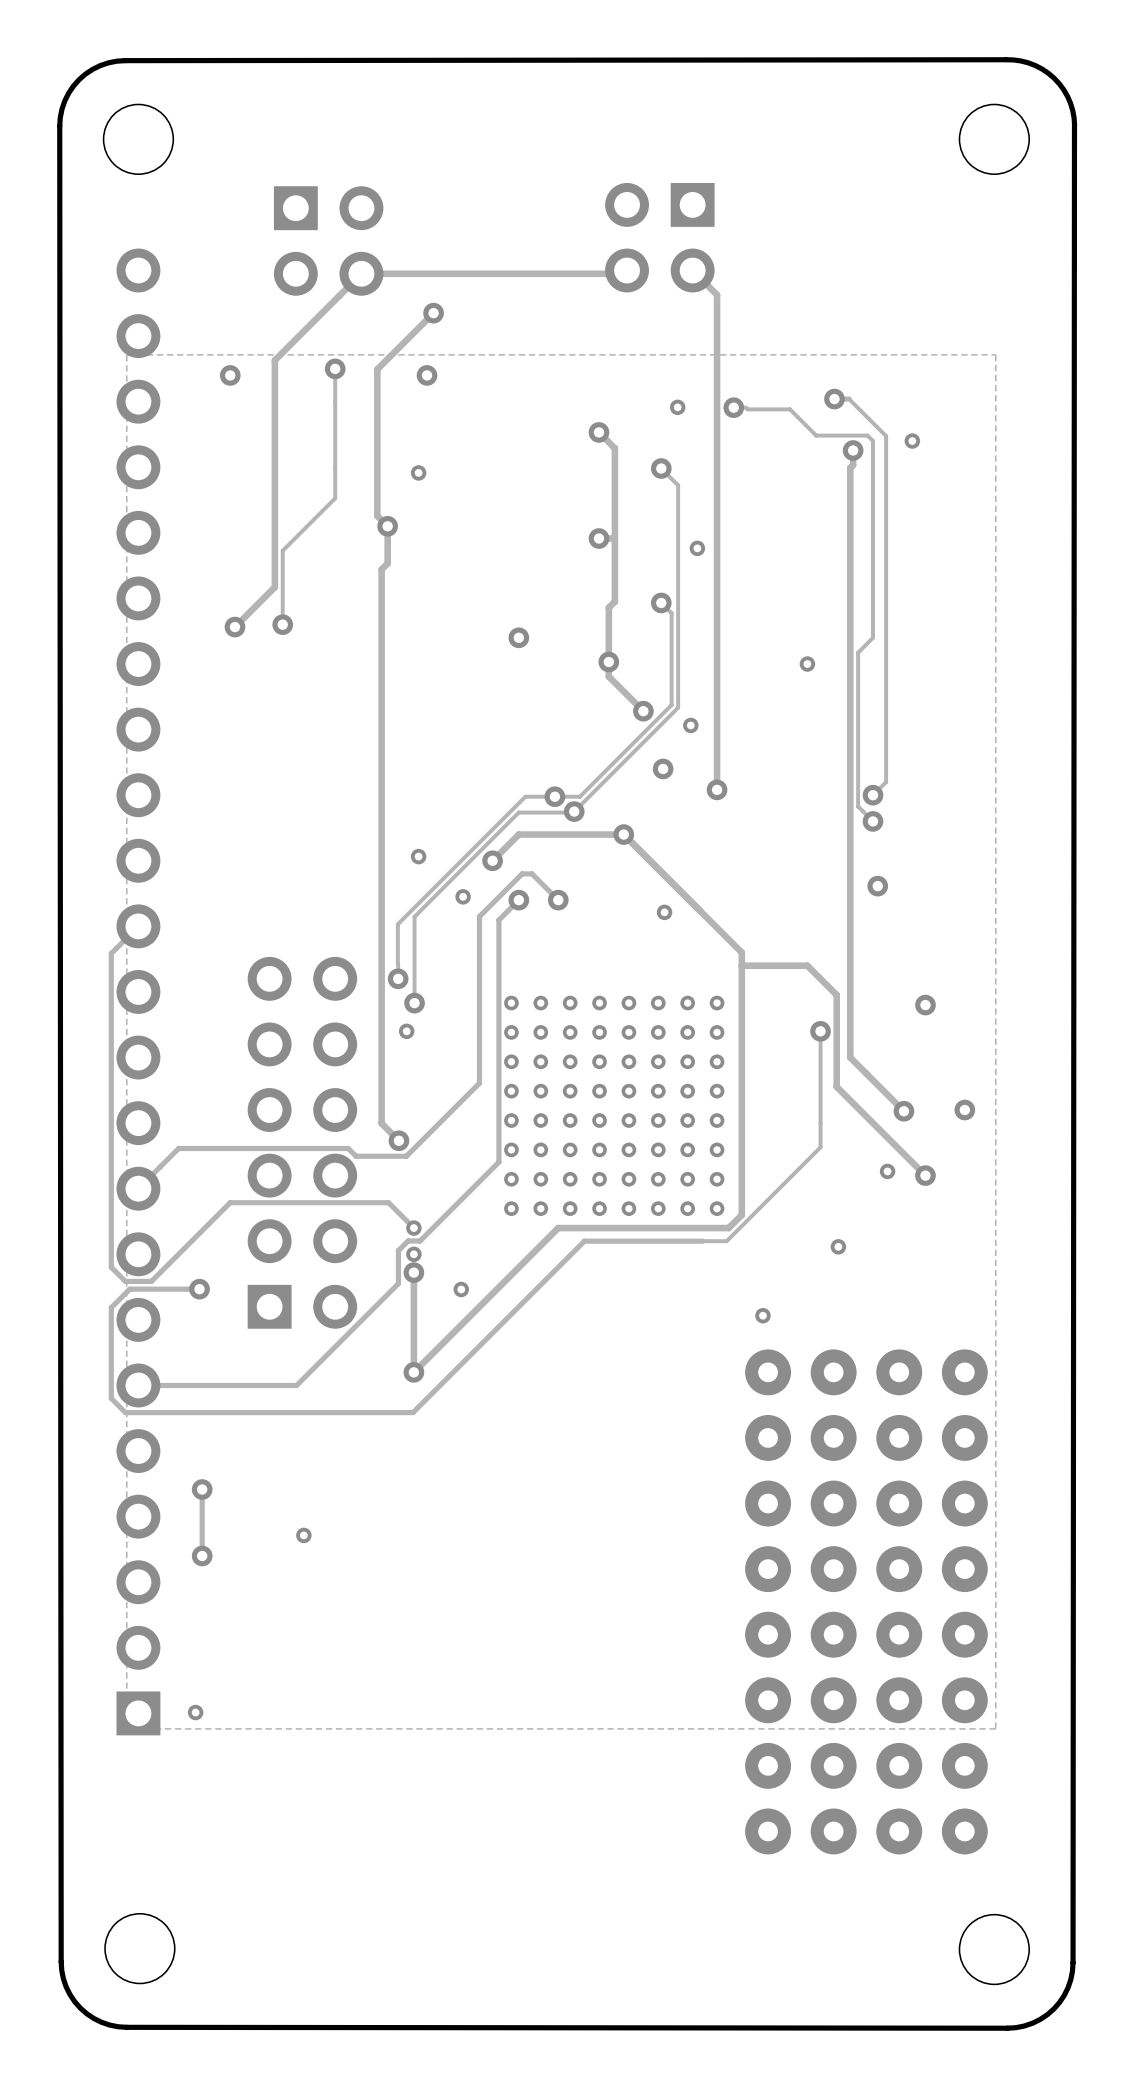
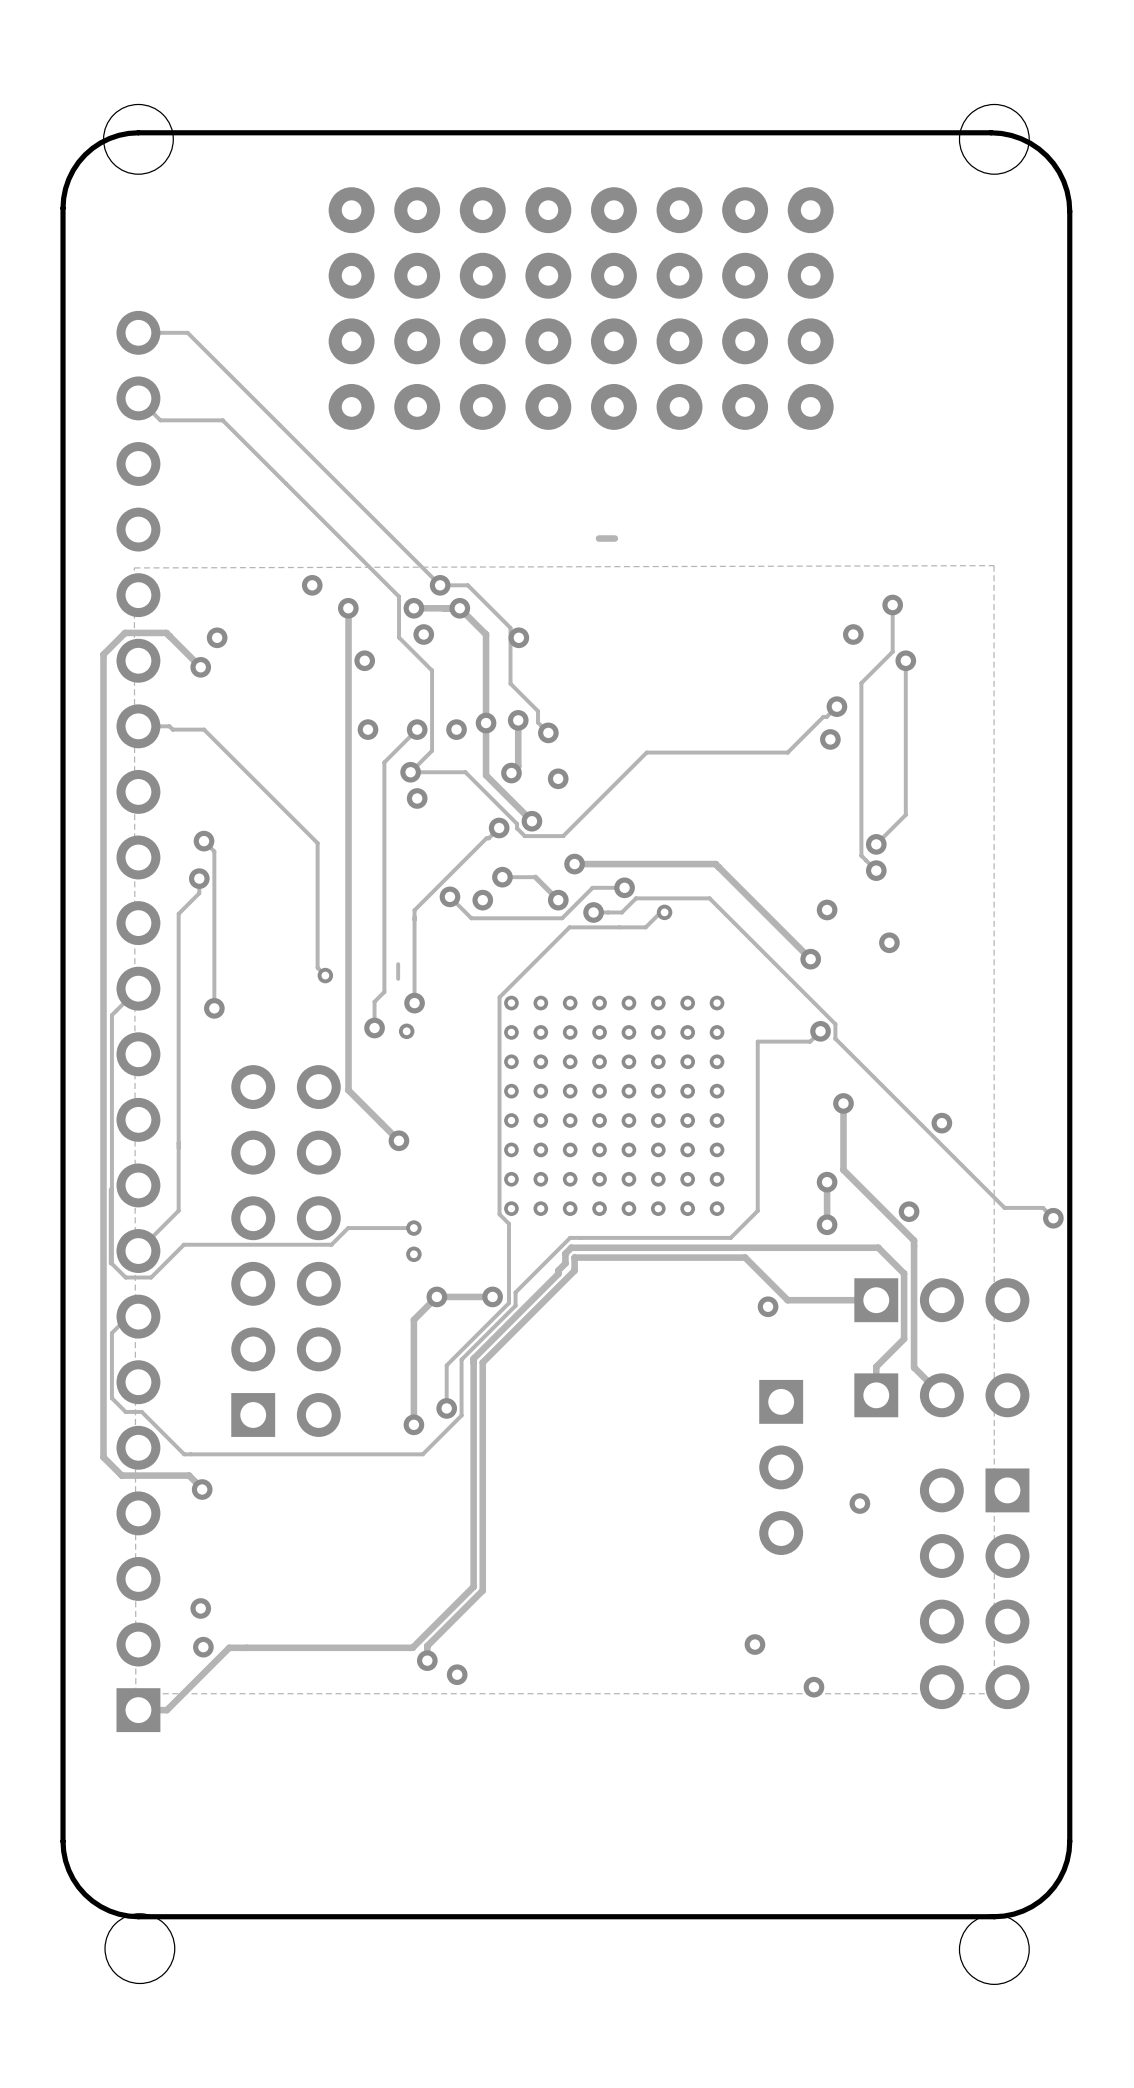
board edge: (1006, 59) (1028, 62) (1042, 69) (1054, 78) (1063, 89) (1070, 103) (1074, 125) (1073, 1962) (1068, 1987) (1059, 2002) (1040, 2019) (1024, 2025) (1007, 2028) (126, 2027) (101, 2022) (86, 2013) (69, 1994) (63, 1978) (61, 1961) (59, 126) (64, 101) (73, 86) (92, 69) (108, 62) (125, 60) (1005, 59) -> none
board edge: none -> (991, 132) (138, 132) (118, 135) (100, 142) (85, 154) (73, 170) (65, 188) (63, 208) (63, 1841) (65, 1860) (73, 1879) (85, 1894) (100, 1906) (118, 1914) (138, 1916) (994, 1916) (1013, 1914) (1032, 1906) (1047, 1894) (1059, 1879) (1067, 1860) (1069, 1841) (1069, 211) (1063, 181) (1046, 155) (1021, 138) (991, 132)
part: (659, 237) -> none
part: (328, 240) -> none
track: (627, 270) (623, 273) (361, 273) (274, 360) (274, 587) (234, 627) -> none
track: (692, 270) (717, 294) (717, 789) -> none
part: none -> (581, 308)
track: (433, 313) (377, 369) (377, 515) (387, 526) (387, 563) (381, 569) (381, 1123) -> (348, 608) (348, 1090) (381, 1123)
via: (433, 313) -> none
track: none -> (138, 332) (187, 332) (440, 585) (467, 585) (510, 627) (510, 683) (538, 711) (538, 722) (548, 732)
zone outline: (995, 354) (126, 354) (126, 1728) (995, 1728) (995, 354) -> (994, 565) (994, 1693) (135, 1693) (134, 567) (994, 565)
track: (335, 368) (335, 498) (282, 550) (282, 624) -> none
via: (335, 368) -> none
via: (230, 375) -> none
via: (427, 375) -> none
track: none -> (138, 398) (160, 420) (222, 420) (399, 596) (399, 637) (432, 670) (432, 750) (410, 772) (465, 772) (517, 823) (517, 828) (524, 836) (563, 836) (646, 752) (787, 752) (823, 716) (826, 716) (836, 706)
track: (834, 399) (849, 399) (886, 436) (886, 782) (873, 795) -> none
via: (834, 399) -> none
via: (677, 407) -> none
track: (733, 407) (790, 409) (816, 435) (867, 435) (873, 441) (873, 637) (858, 652) (858, 806) (873, 821) -> none
via: (733, 407) -> none
track: (598, 432) (614, 448) (614, 601) (608, 607) (608, 676) (643, 711) -> none
via: (598, 432) -> none
via: (912, 441) -> none
track: (853, 450) (853, 465) (850, 467) (850, 1057) (903, 1111) -> none
via: (853, 450) -> none
track: (661, 468) (678, 485) (678, 707) (573, 812) (518, 812) (414, 916) -> (499, 827) (414, 910) (414, 916)
via: (661, 468) -> none
via: (418, 472) -> none
via: (387, 526) -> none
via: (598, 538) -> none
via: (697, 548) -> none
via: none -> (312, 585)
via: none -> (440, 585)
track: (661, 602) (671, 613) (671, 704) (579, 796) (525, 796) (397, 924) (397, 963) -> none
via: (661, 602) -> none
track: none -> (892, 605) (892, 651) (861, 683) (861, 855) (876, 870)
via: none -> (892, 605)
via: none -> (348, 608)
track: none -> (413, 608) (459, 608) (486, 634) (486, 775) (531, 821)
via: none -> (413, 608)
via: none -> (459, 608)
via: (282, 624) -> none
via position: (234, 627) -> (217, 637)
via: none -> (423, 634)
via: none -> (853, 634)
via: none -> (364, 660)
track: none -> (905, 660) (905, 814) (876, 844)
via: none -> (905, 660)
via: (608, 661) -> none
via: (807, 664) -> none
track: none -> (200, 667) (166, 632) (125, 632) (103, 654) (103, 1457) (121, 1475) (189, 1475) (200, 1487)
via: none -> (200, 667)
via: none -> (836, 706)
via: (643, 711) -> none
track: none -> (518, 720) (518, 766) (511, 773)
via: none -> (518, 720)
via: none -> (486, 723)
via: (690, 725) -> none
track: none -> (138, 726) (169, 726) (172, 729) (204, 729) (317, 843) (317, 967) (325, 975)
via: none -> (367, 729)
track: none -> (417, 729) (384, 762) (384, 991) (374, 1001) (374, 1028)
via: none -> (417, 729)
via: none -> (456, 729)
via: none -> (548, 732)
via: none -> (830, 739)
via: (663, 768) -> none
via: none -> (410, 772)
via: none -> (511, 773)
via: (717, 789) -> none
via: (873, 795) -> none
via position: (554, 796) -> (558, 778)
via: none -> (417, 798)
via: (574, 811) -> none
via: none -> (531, 821)
via: (873, 821) -> none
via: none -> (499, 827)
via: (623, 834) -> none
track: none -> (204, 841) (214, 851) (214, 1011)
via: none -> (204, 841)
via: none -> (876, 844)
via: (418, 856) -> none
track: (492, 860) (518, 834) (623, 834) (741, 952) (741, 1214) (728, 1228) (558, 1228) (413, 1372) -> (413, 1424) (413, 1372)
via position: (492, 860) -> (502, 877)
track: none -> (574, 864) (715, 864) (810, 959)
via: none -> (574, 864)
track: (535, 877) (532, 873) (522, 873) (479, 916) (479, 1083) (406, 1156) (355, 1156) (348, 1148) (178, 1148) (138, 1188) -> (535, 877) (502, 877)
track: none -> (199, 878) (199, 893) (178, 913) (178, 1210) (138, 1251)
via: none -> (199, 878)
via position: (877, 886) -> (876, 870)
track: none -> (624, 887) (592, 887) (562, 918) (471, 918) (449, 896)
via: none -> (624, 887)
via position: (463, 896) -> (449, 896)
via: none -> (482, 900)
track: (518, 900) (498, 920) (498, 1162) (420, 1240) (408, 1240) (398, 1250) (398, 1283) (296, 1385) (138, 1385) -> none
via: (518, 900) -> none
via: none -> (827, 909)
track: none -> (593, 912) (621, 912) (636, 898) (709, 898) (835, 1024) (835, 1038) (1004, 1207) (1043, 1207) (1053, 1218)
via: none -> (593, 912)
track: none -> (659, 913) (645, 927) (569, 927) (499, 997) (499, 1214) (509, 1223) (509, 1303) (446, 1365) (446, 1408)
track: (138, 926) (111, 953) (111, 1189) -> (138, 988) (111, 1015) (111, 1189)
via: none -> (889, 942)
via: none -> (810, 959)
track: (741, 965) (807, 965) (836, 995) (836, 1086) (925, 1175) -> none
via: none -> (325, 975)
via: (398, 978) -> none
part: (138, 991) -> none
via: (925, 1005) -> none
via: none -> (214, 1008)
part: none -> (138, 1021)
via: none -> (374, 1028)
track: (820, 1031) (820, 1147) (726, 1241) (584, 1241) (413, 1412) (125, 1412) (111, 1398) (111, 1307) (129, 1289) (199, 1289) -> (820, 1031) (810, 1041) (757, 1041) (757, 1210) (730, 1237) (570, 1237) (515, 1292) (515, 1305) (461, 1359) (461, 1415) (422, 1454) (184, 1454) (141, 1411) (125, 1411) (111, 1398) (111, 1333) (128, 1316) (138, 1316)
track: none -> (843, 1103) (843, 1170) (914, 1240) (914, 1367) (941, 1395)
via: none -> (843, 1103)
via: (964, 1110) -> none
via: (903, 1111) -> none
via: none -> (941, 1123)
part position: (302, 1142) -> (286, 1251)
via: (887, 1171) -> none
via: (925, 1175) -> none
track: none -> (827, 1182) (827, 1224)
via: none -> (827, 1182)
via: none -> (909, 1211)
via: none -> (1053, 1218)
via: none -> (827, 1224)
track: (413, 1228) (388, 1202) (230, 1202) (151, 1281) (125, 1281) (111, 1267) (111, 1263) -> (413, 1228) (348, 1228) (331, 1244) (183, 1244) (151, 1277) (125, 1277) (111, 1263)
via: (838, 1246) -> none
track: (413, 1272) (413, 1319) -> (492, 1296) (436, 1296) (413, 1319)
via position: (413, 1272) -> (436, 1296)
via: (199, 1289) -> none
via: (461, 1289) -> none
via: none -> (492, 1296)
track: none -> (876, 1300) (787, 1300) (745, 1257) (574, 1257) (574, 1270) (482, 1362) (482, 1590) (427, 1646) (427, 1660)
part: none -> (941, 1300)
via size: [755, 1307, 771, 1324] -> [757, 1296, 779, 1318]
via: (413, 1372) -> none
track: none -> (876, 1395) (876, 1366) (904, 1339) (904, 1273) (878, 1247) (571, 1247) (565, 1253) (565, 1263) (558, 1270) (558, 1273) (473, 1358) (473, 1586) (412, 1647) (229, 1647) (166, 1710) (138, 1710)
part: none -> (941, 1395)
via: none -> (446, 1408)
via: none -> (413, 1424)
part: none -> (781, 1467)
track: (202, 1489) (202, 1555) -> none
via: none -> (859, 1503)
via: (303, 1535) -> none
via: (202, 1556) -> none
part: none -> (974, 1588)
part: (866, 1601) -> none
via: none -> (200, 1608)
via: none -> (754, 1644)
via: none -> (203, 1647)
via: none -> (427, 1660)
via: none -> (457, 1674)
via: none -> (813, 1687)
via: (195, 1712) -> none

